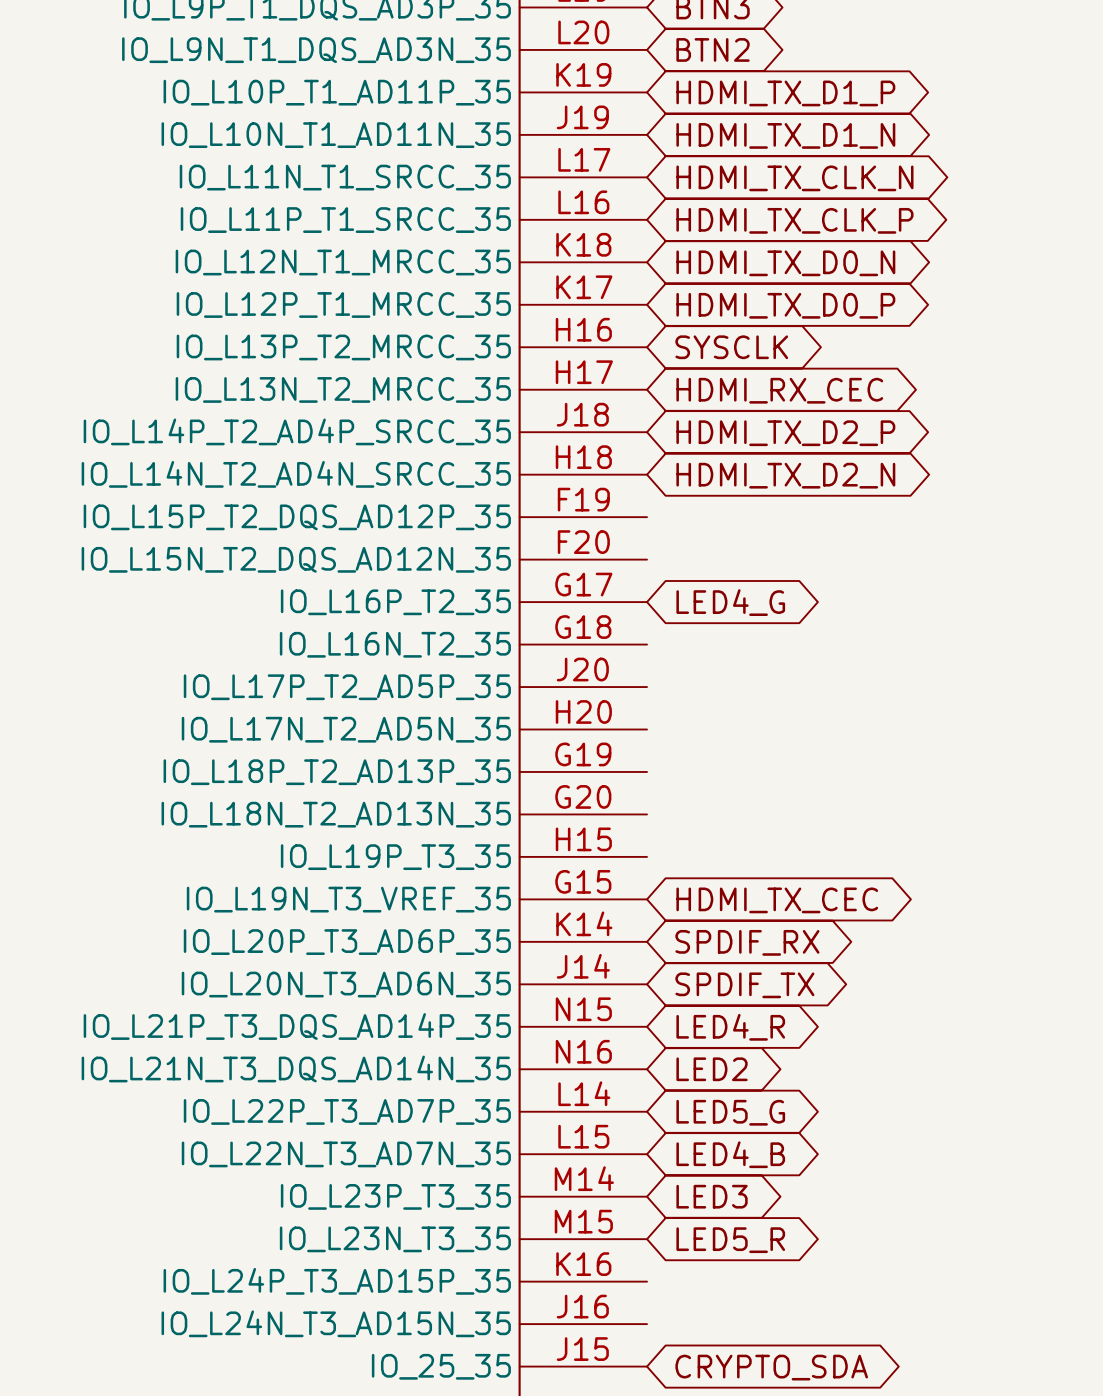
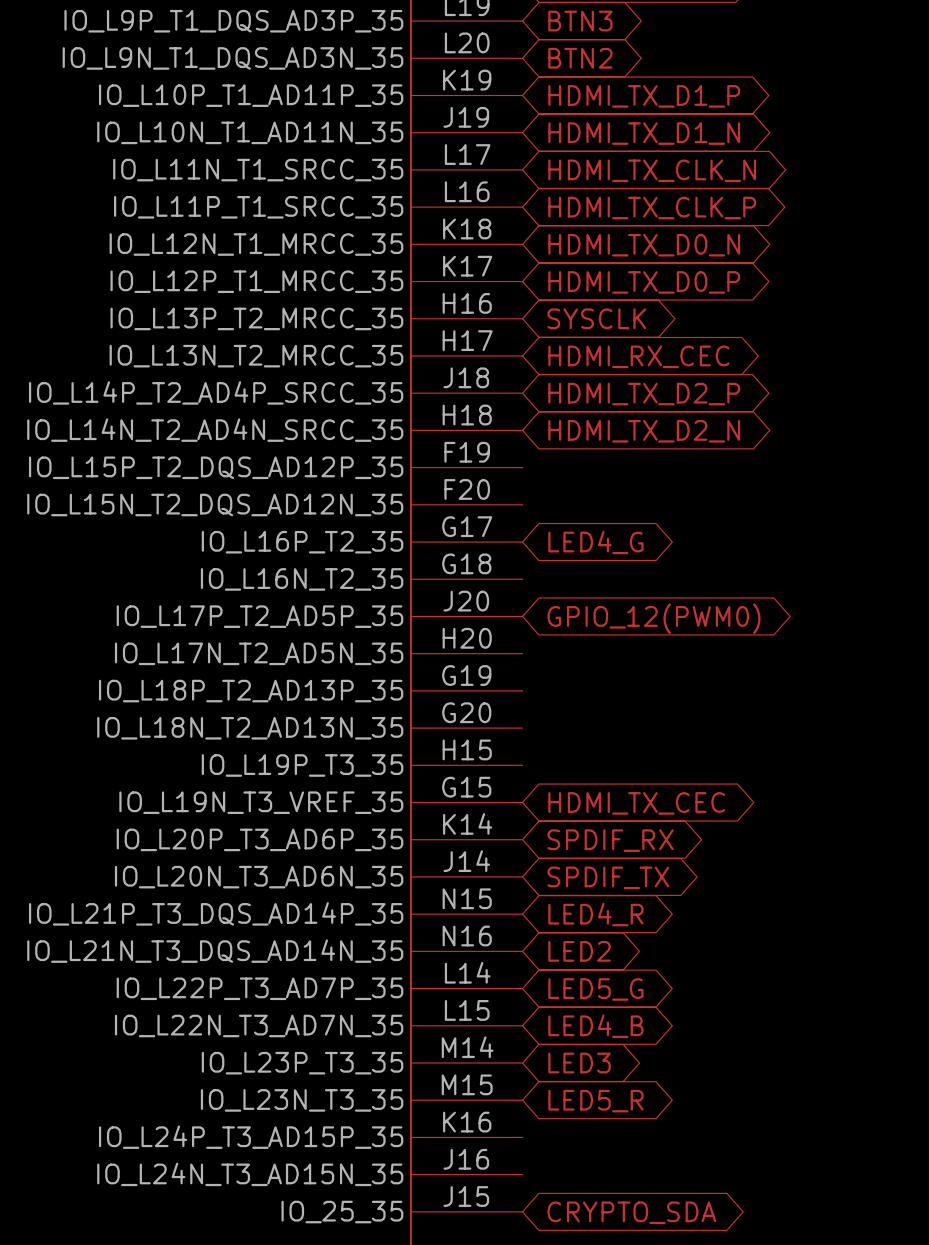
global label: none -> GPIO_12(PWM0) (653, 618)

